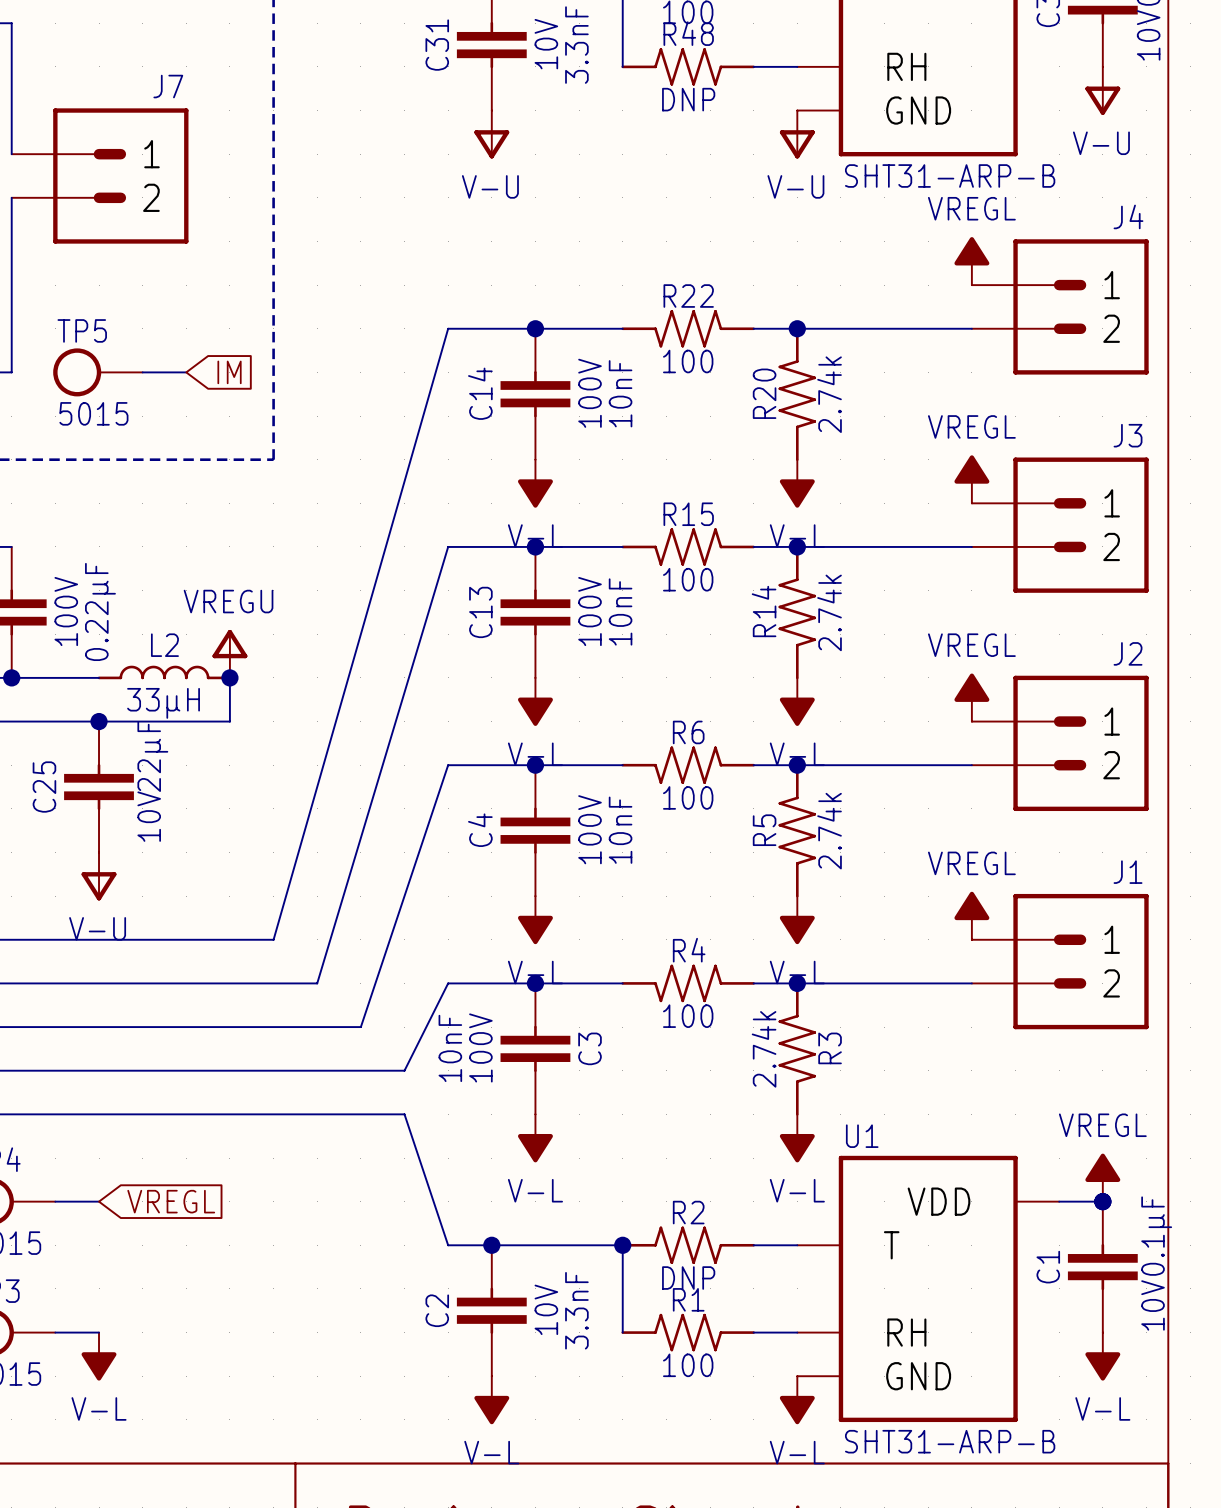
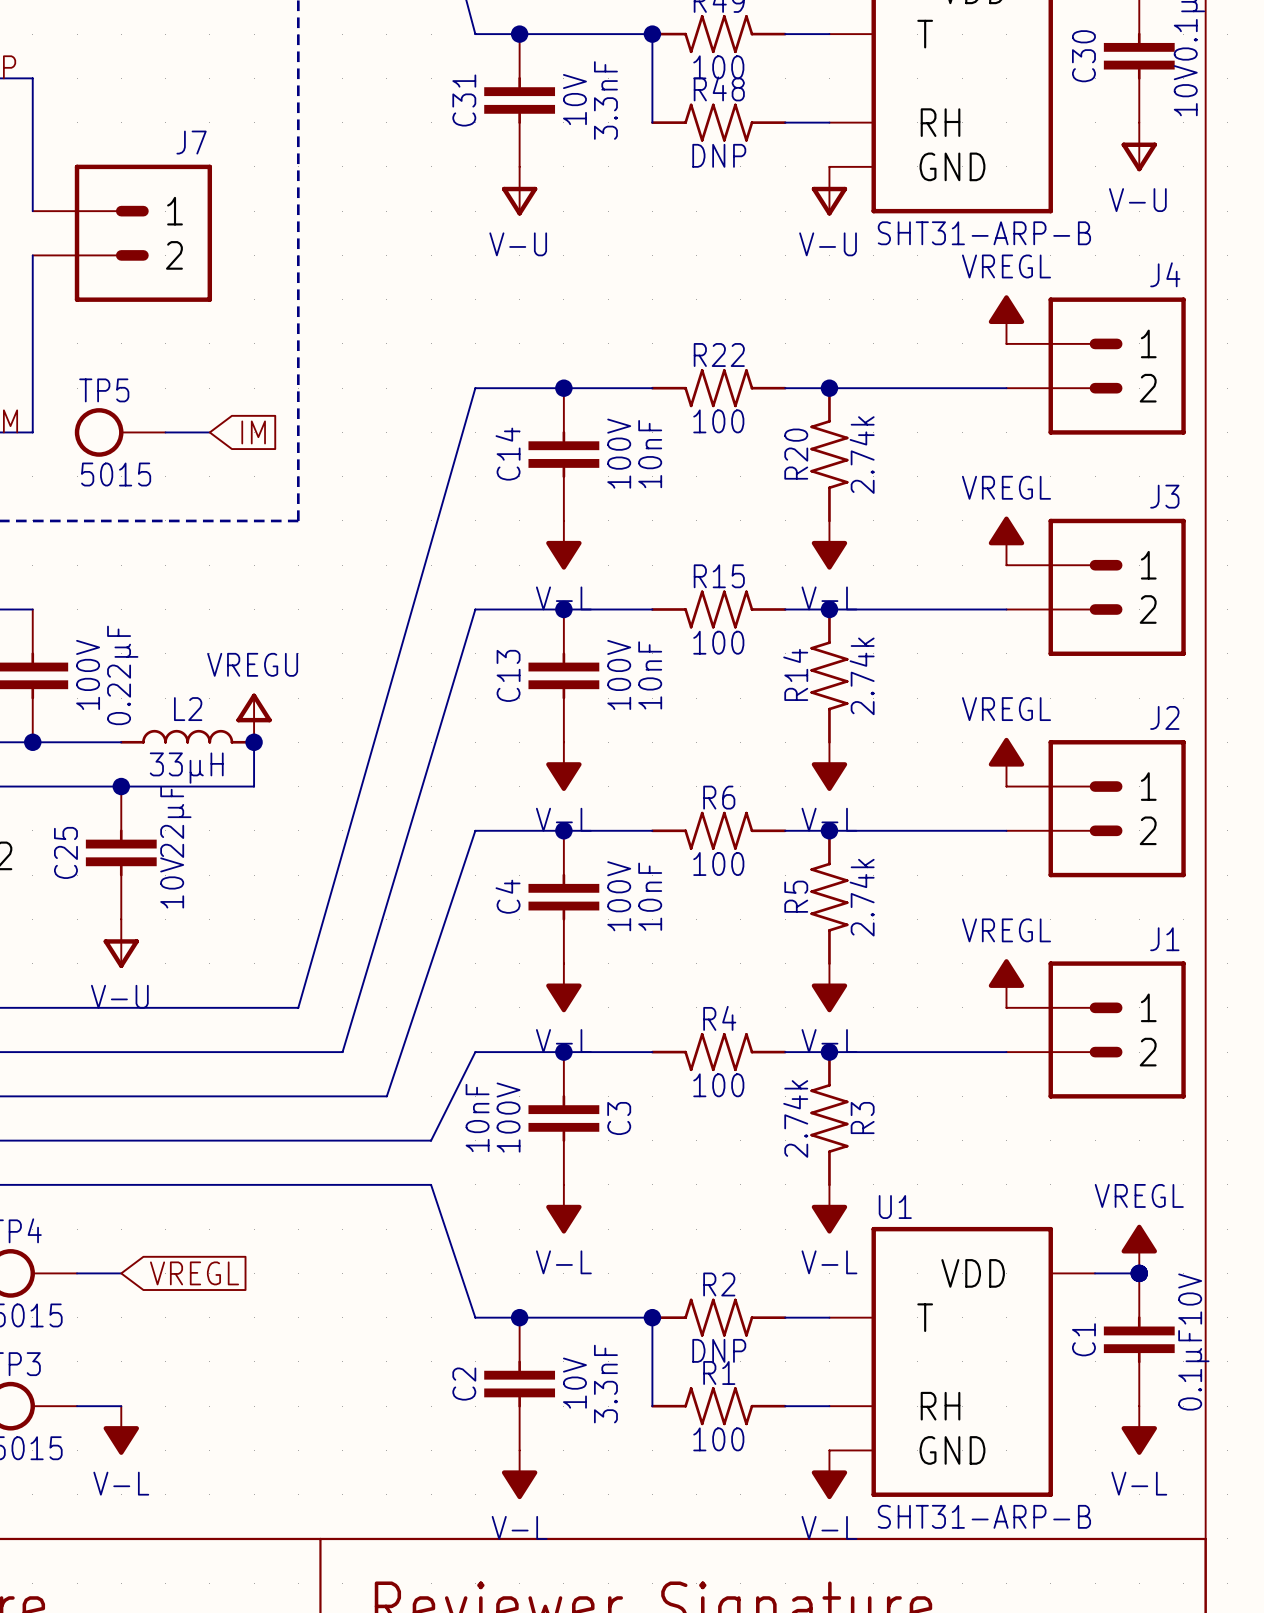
C1 text position: 0.1µF (1156, 1236) -> 0.1µF (1193, 1370)
C1 text position: 10V (1153, 1305) -> 10V (1190, 1299)

